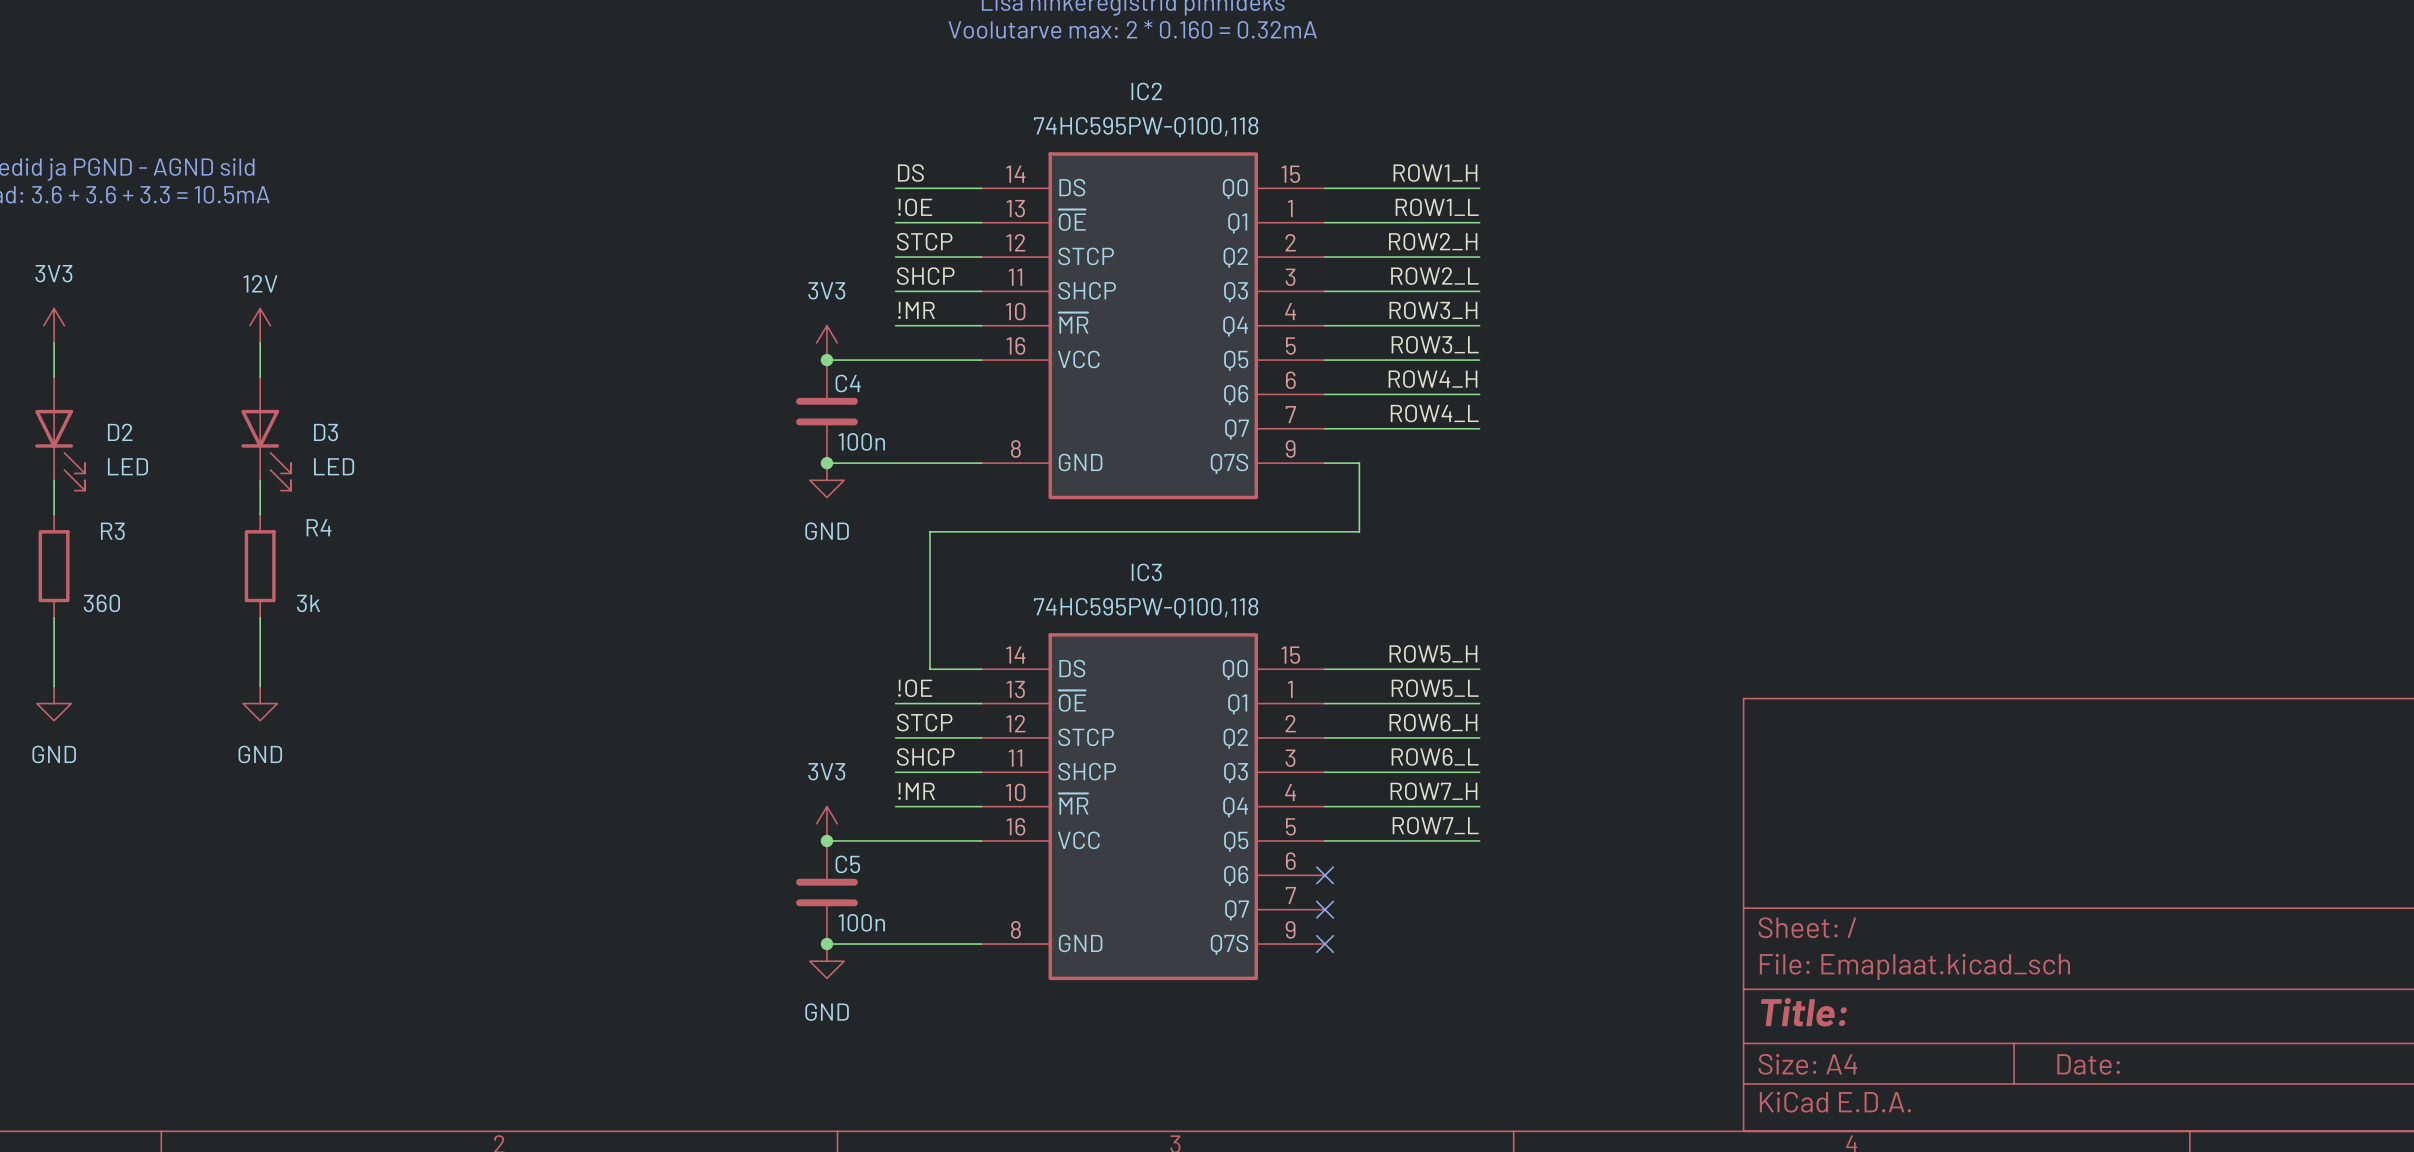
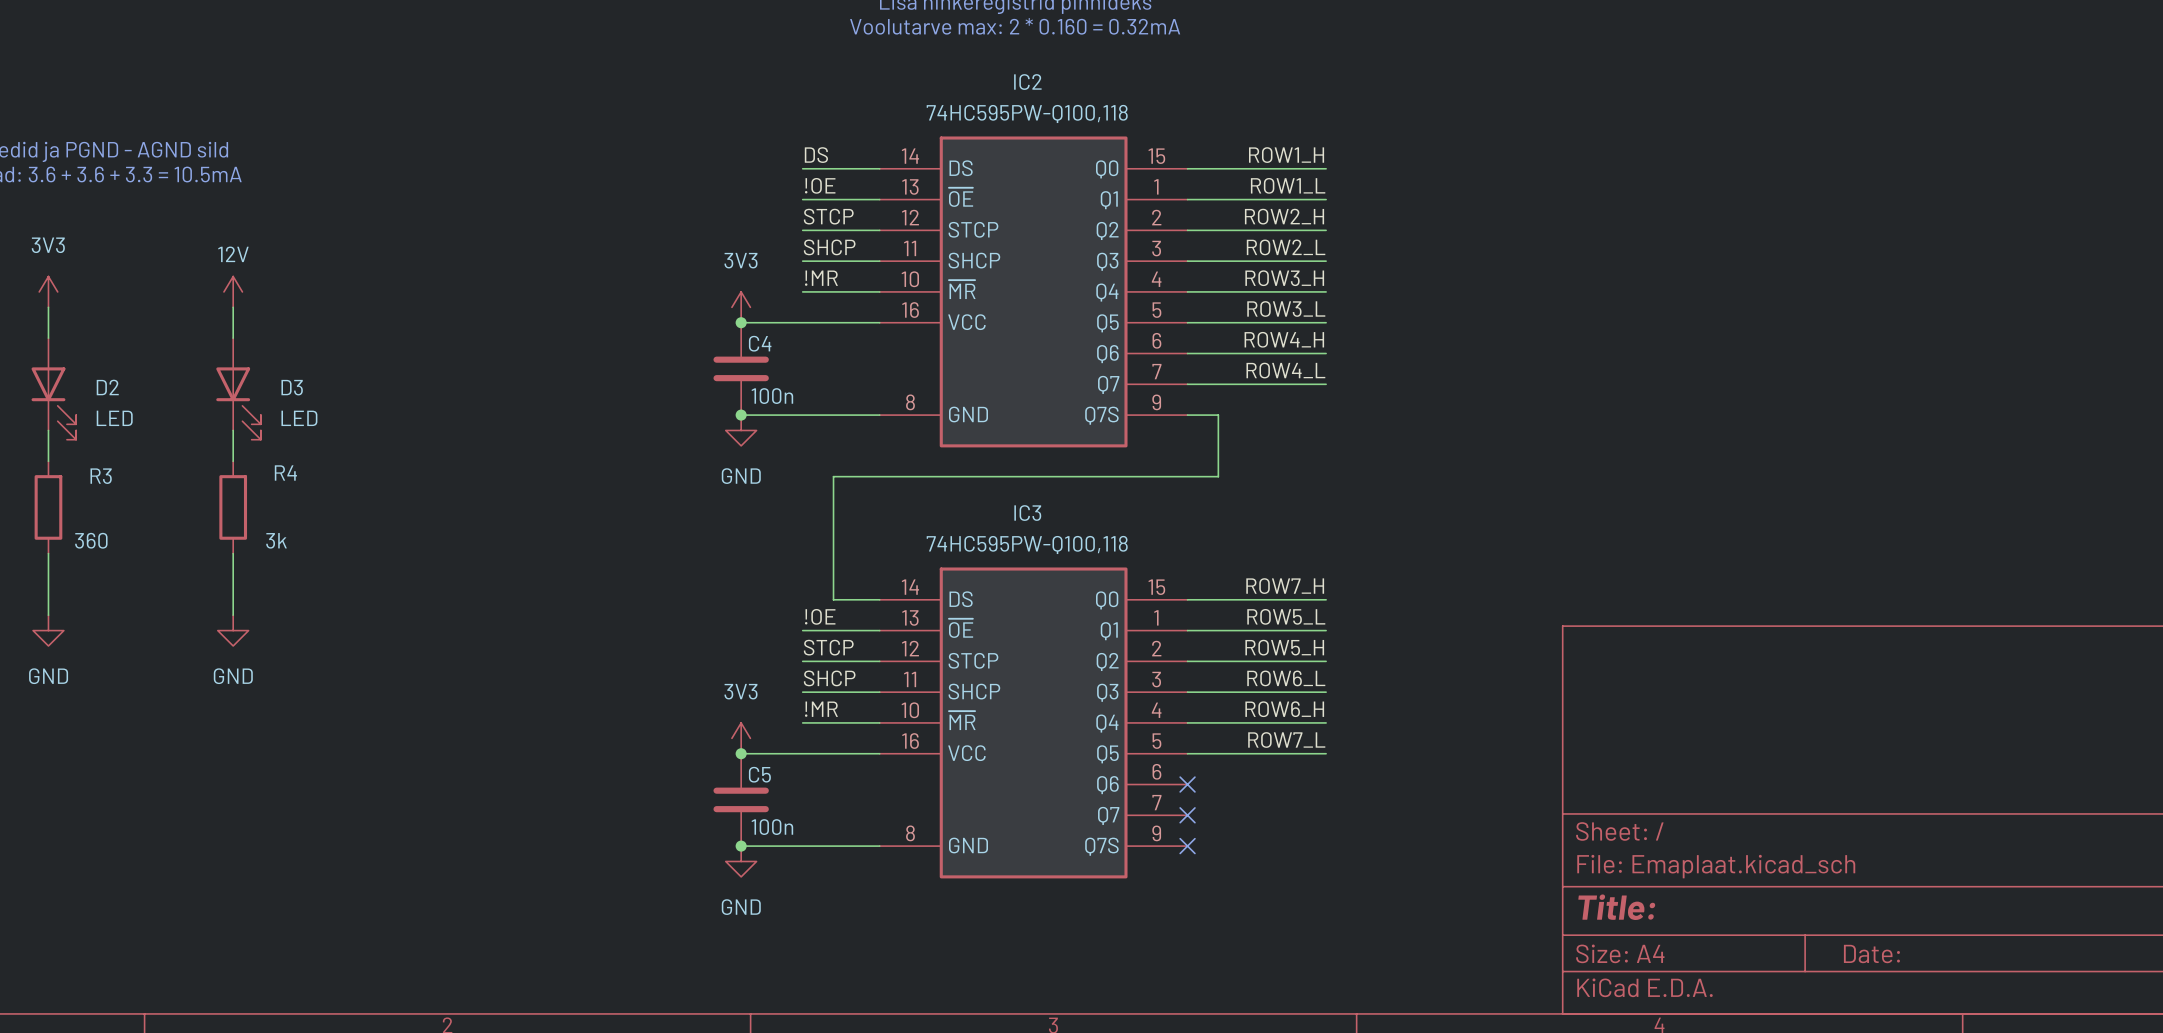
label: ROW5_H (1433, 653) -> ROW7_H (1285, 586)
label: ROW6_H (1433, 722) -> ROW5_H (1284, 647)
label: ROW7_H (1433, 791) -> ROW6_H (1284, 709)

